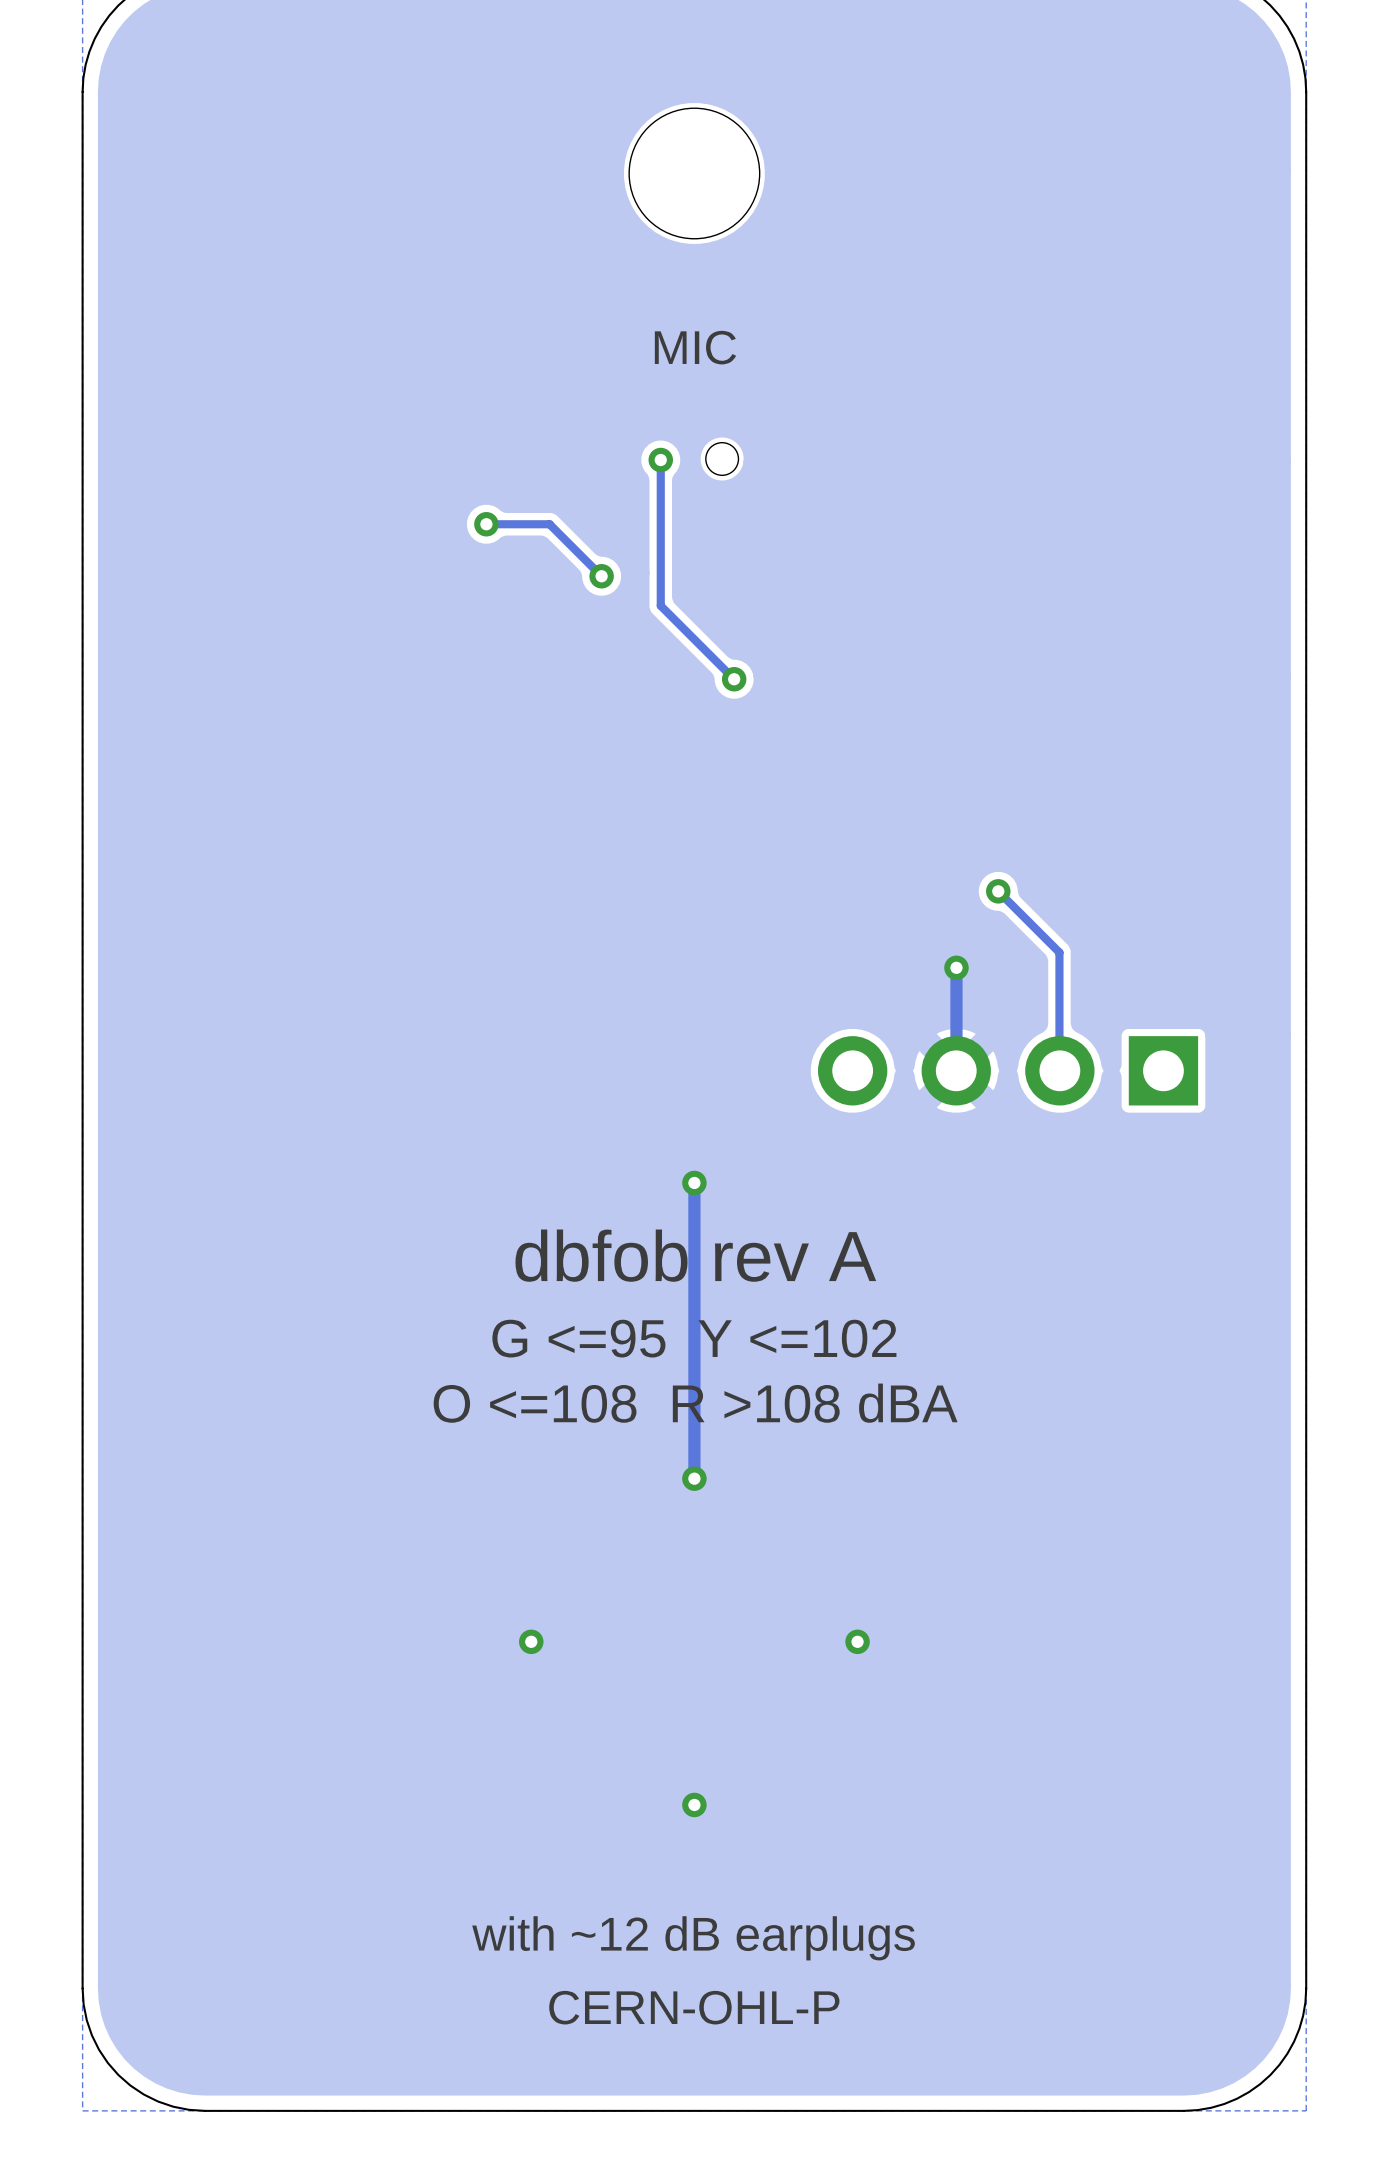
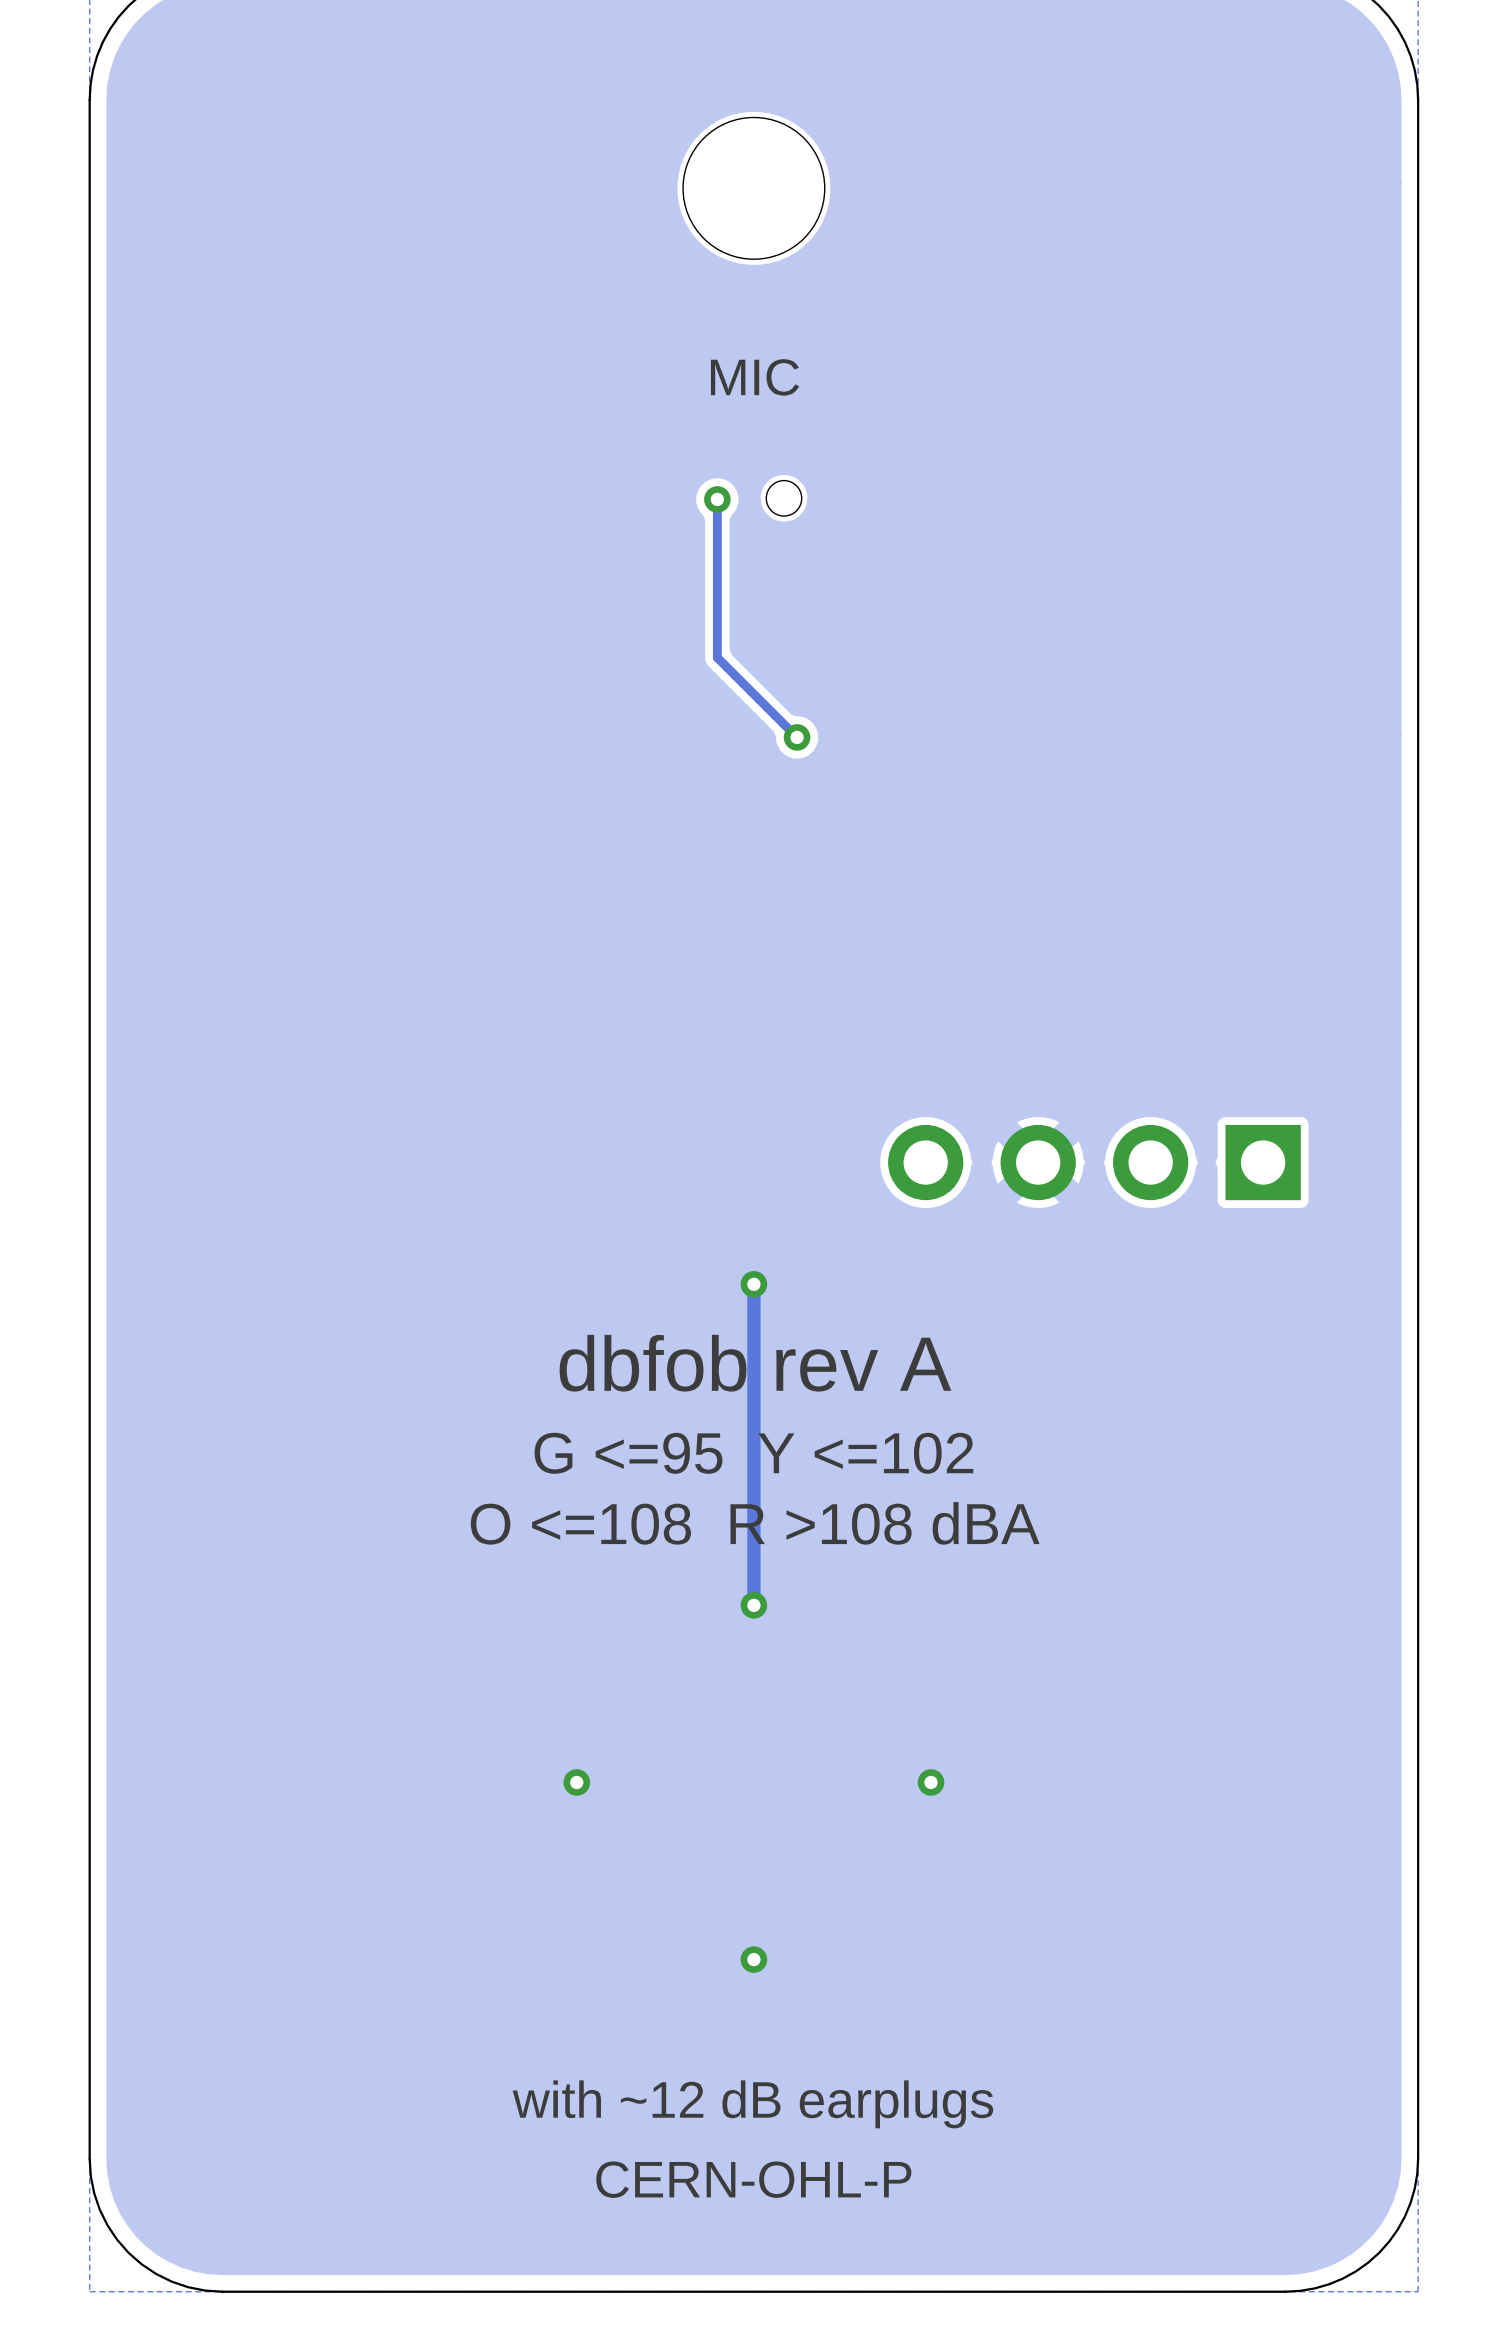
track: (486, 524) (549, 524) (601, 576) -> none
via: (486, 524) -> none
via: (601, 576) -> none
track: (998, 891) (1059, 952) (1059, 1070) -> none
via: (998, 891) -> none
track: (956, 967) (956, 1070) -> none
via: (956, 967) -> none

